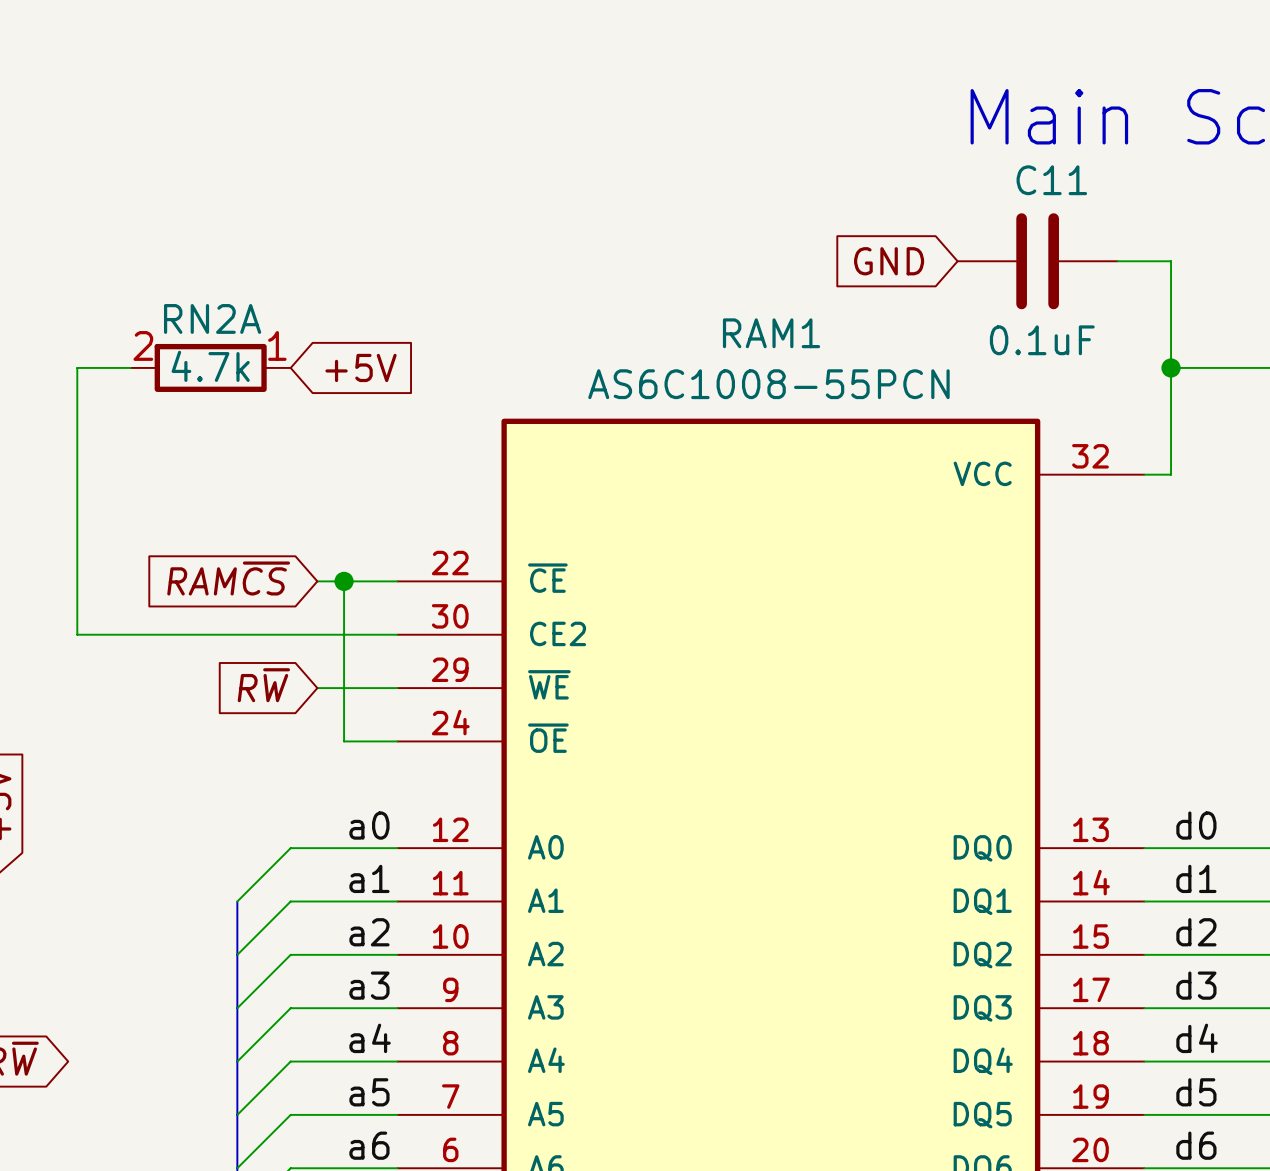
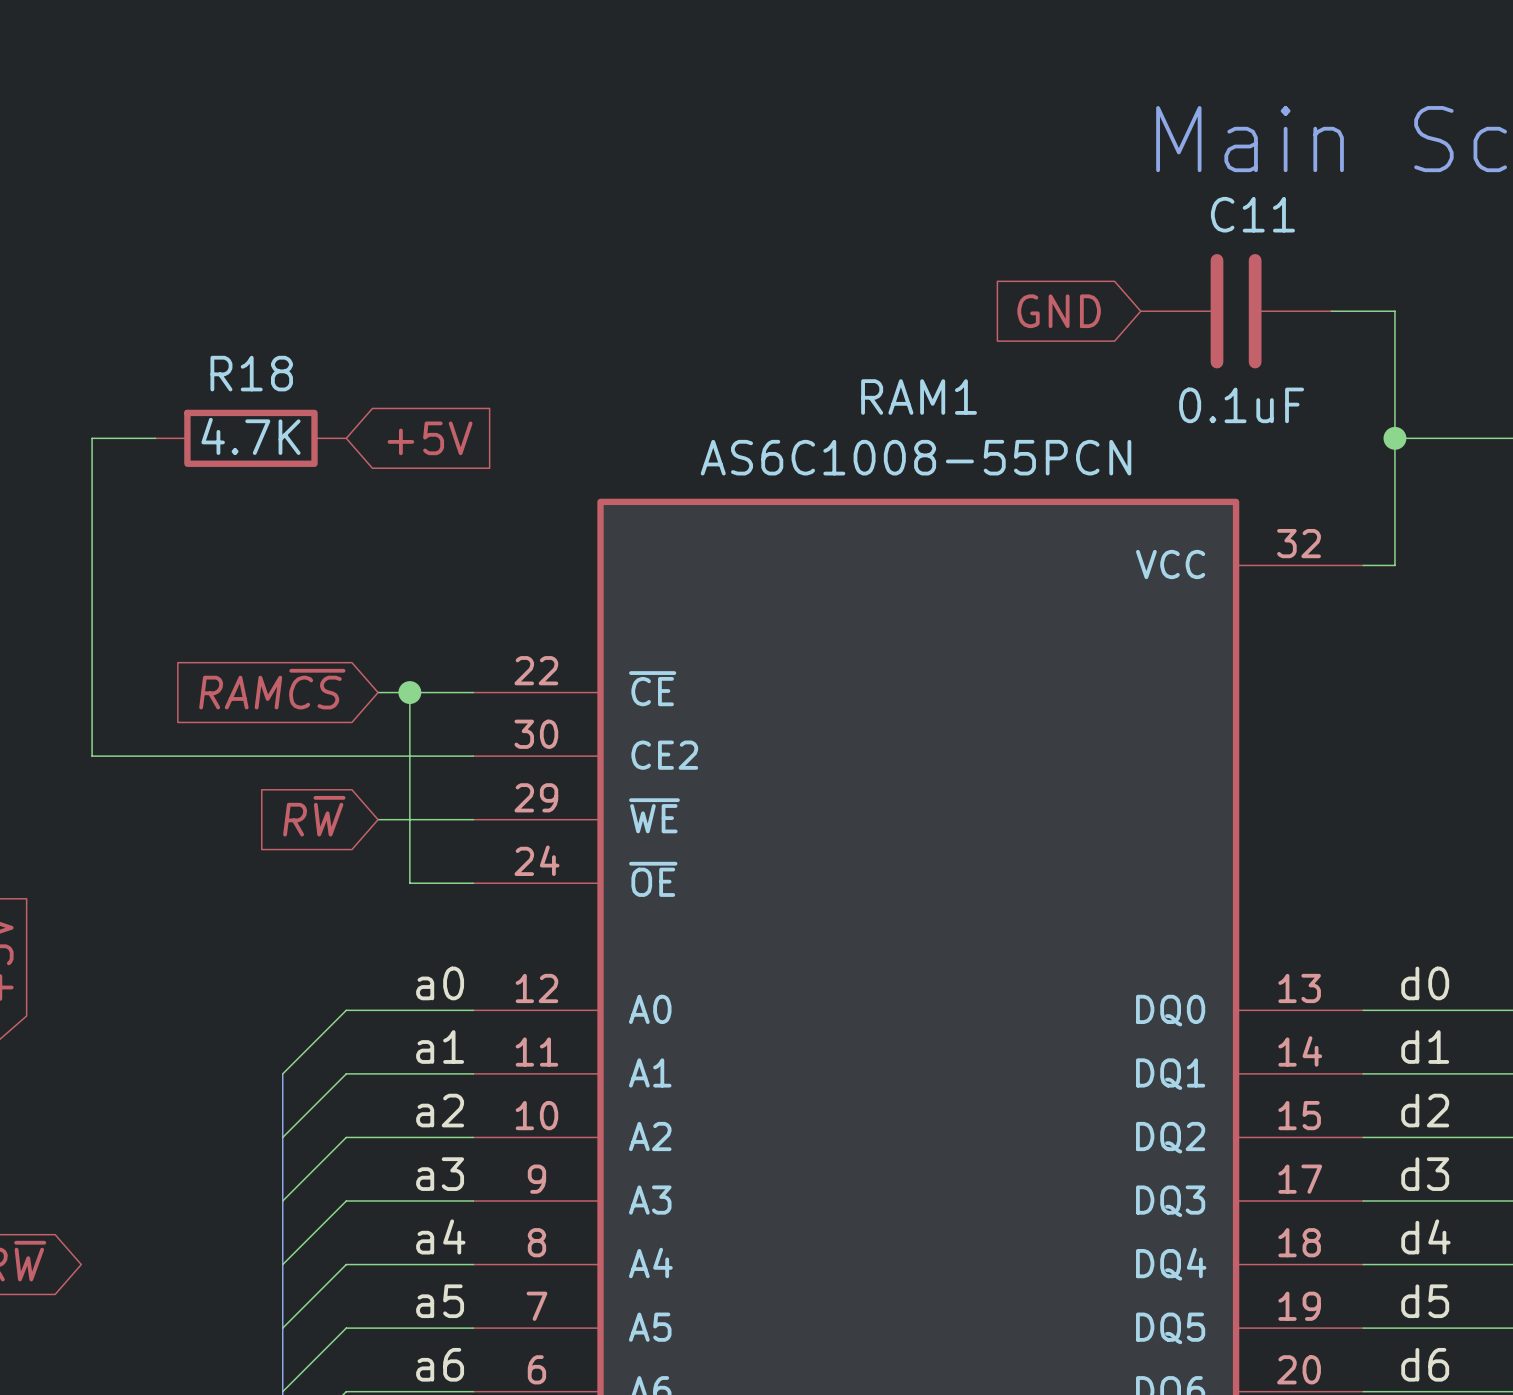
RN2A name: RN2A (212, 318) -> R18 (251, 373)
RN2A pin number: 2 (143, 345) -> none
RN2A pin number: 1 (277, 345) -> none
RN2A value: 4.7k (210, 366) -> 4.7K (250, 436)

